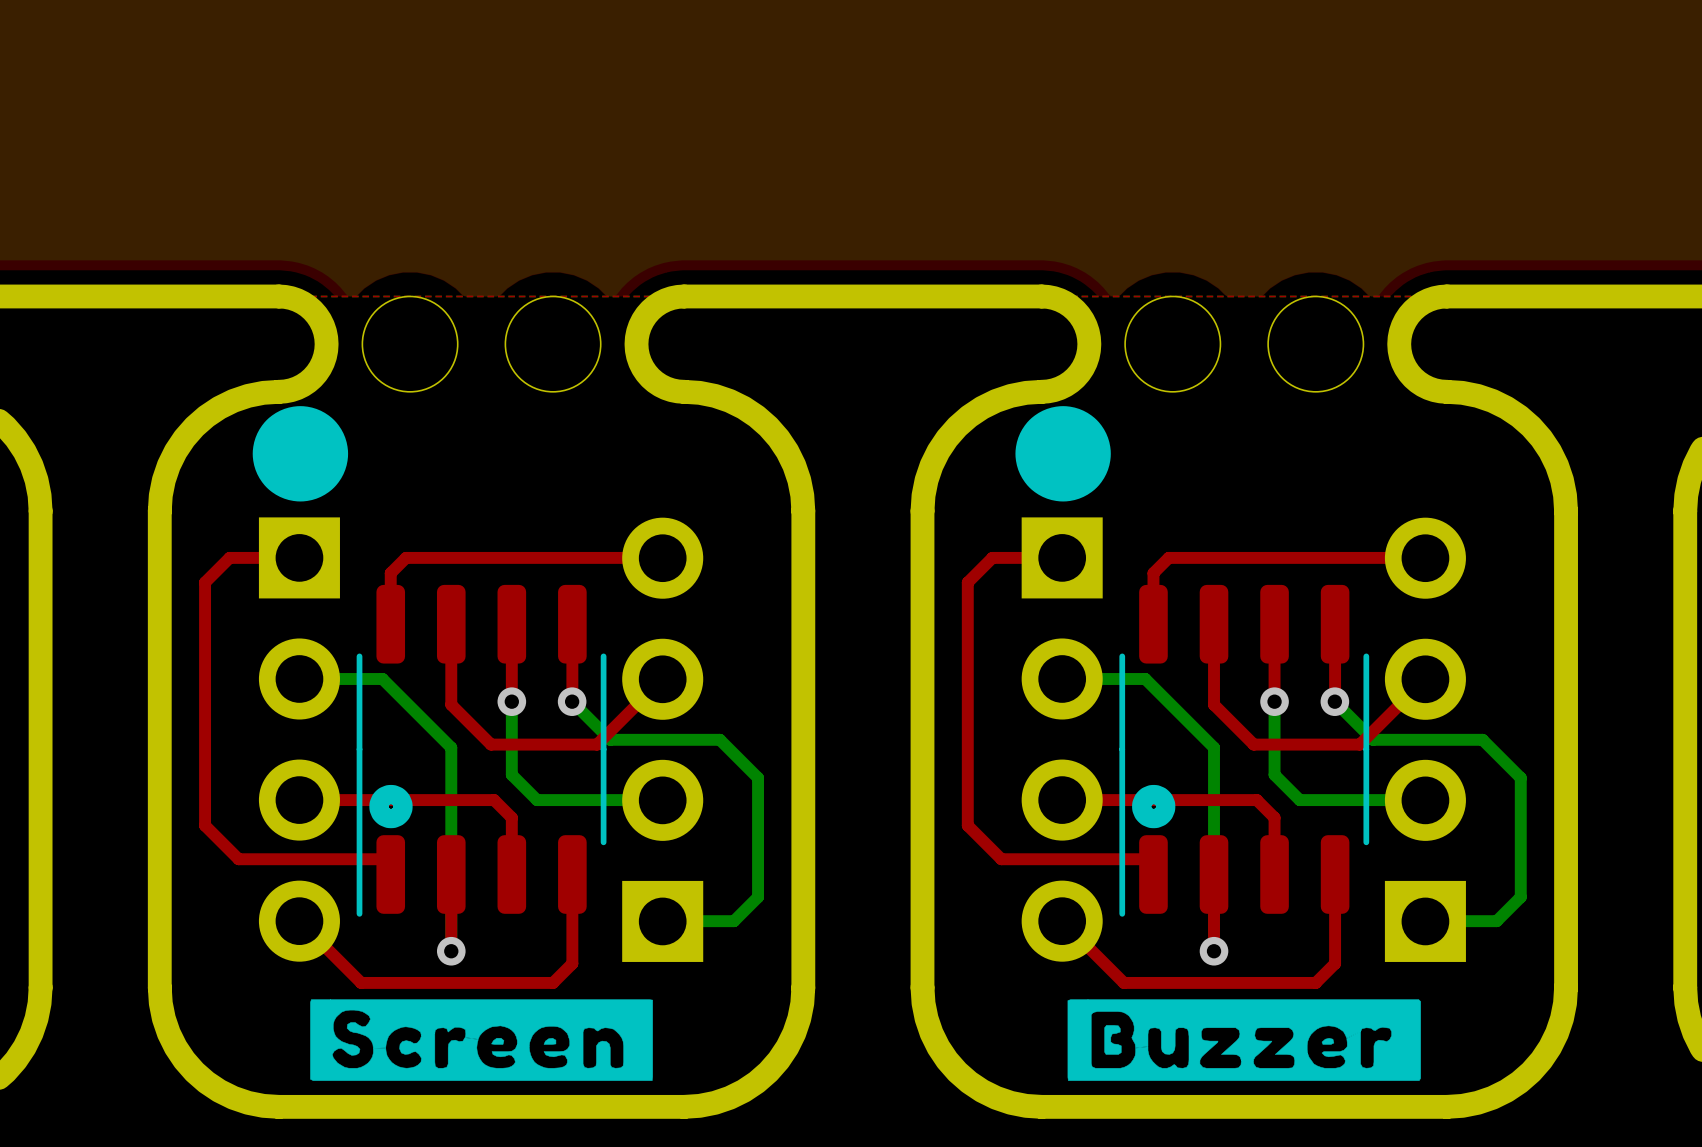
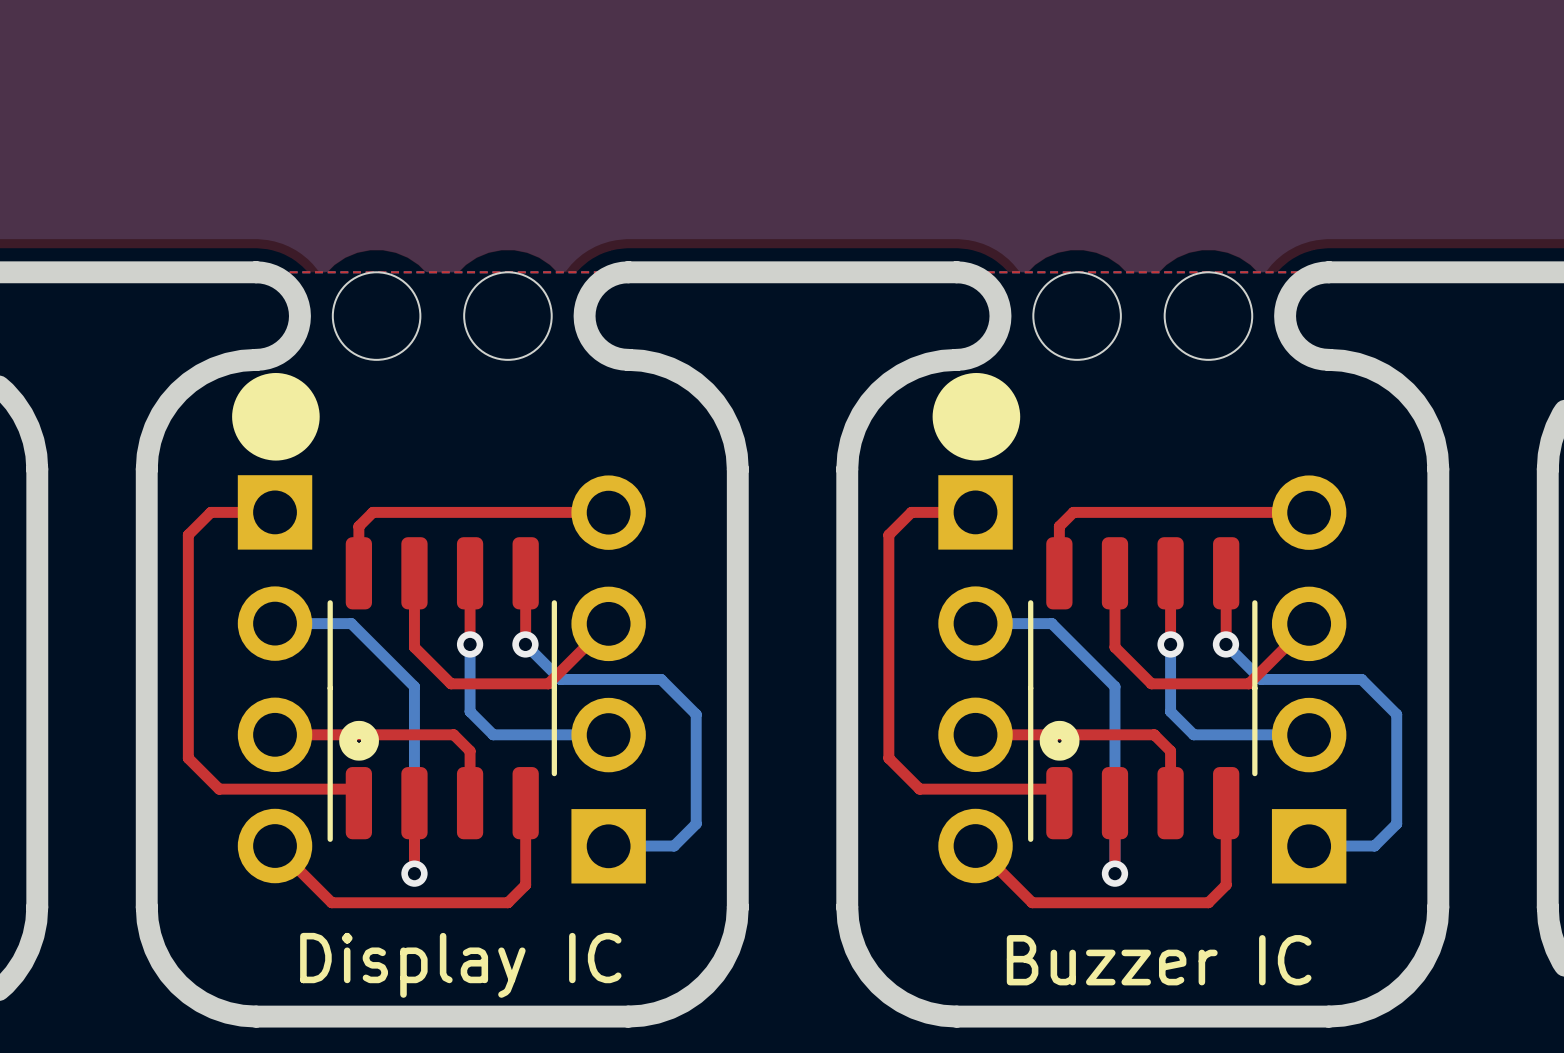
drawing: [310, 999, 653, 1081] -> none
drawing: [1067, 999, 1421, 1081] -> none
text: none -> Buzzer IC (1159, 960)
text: none -> Display IC (460, 965)

